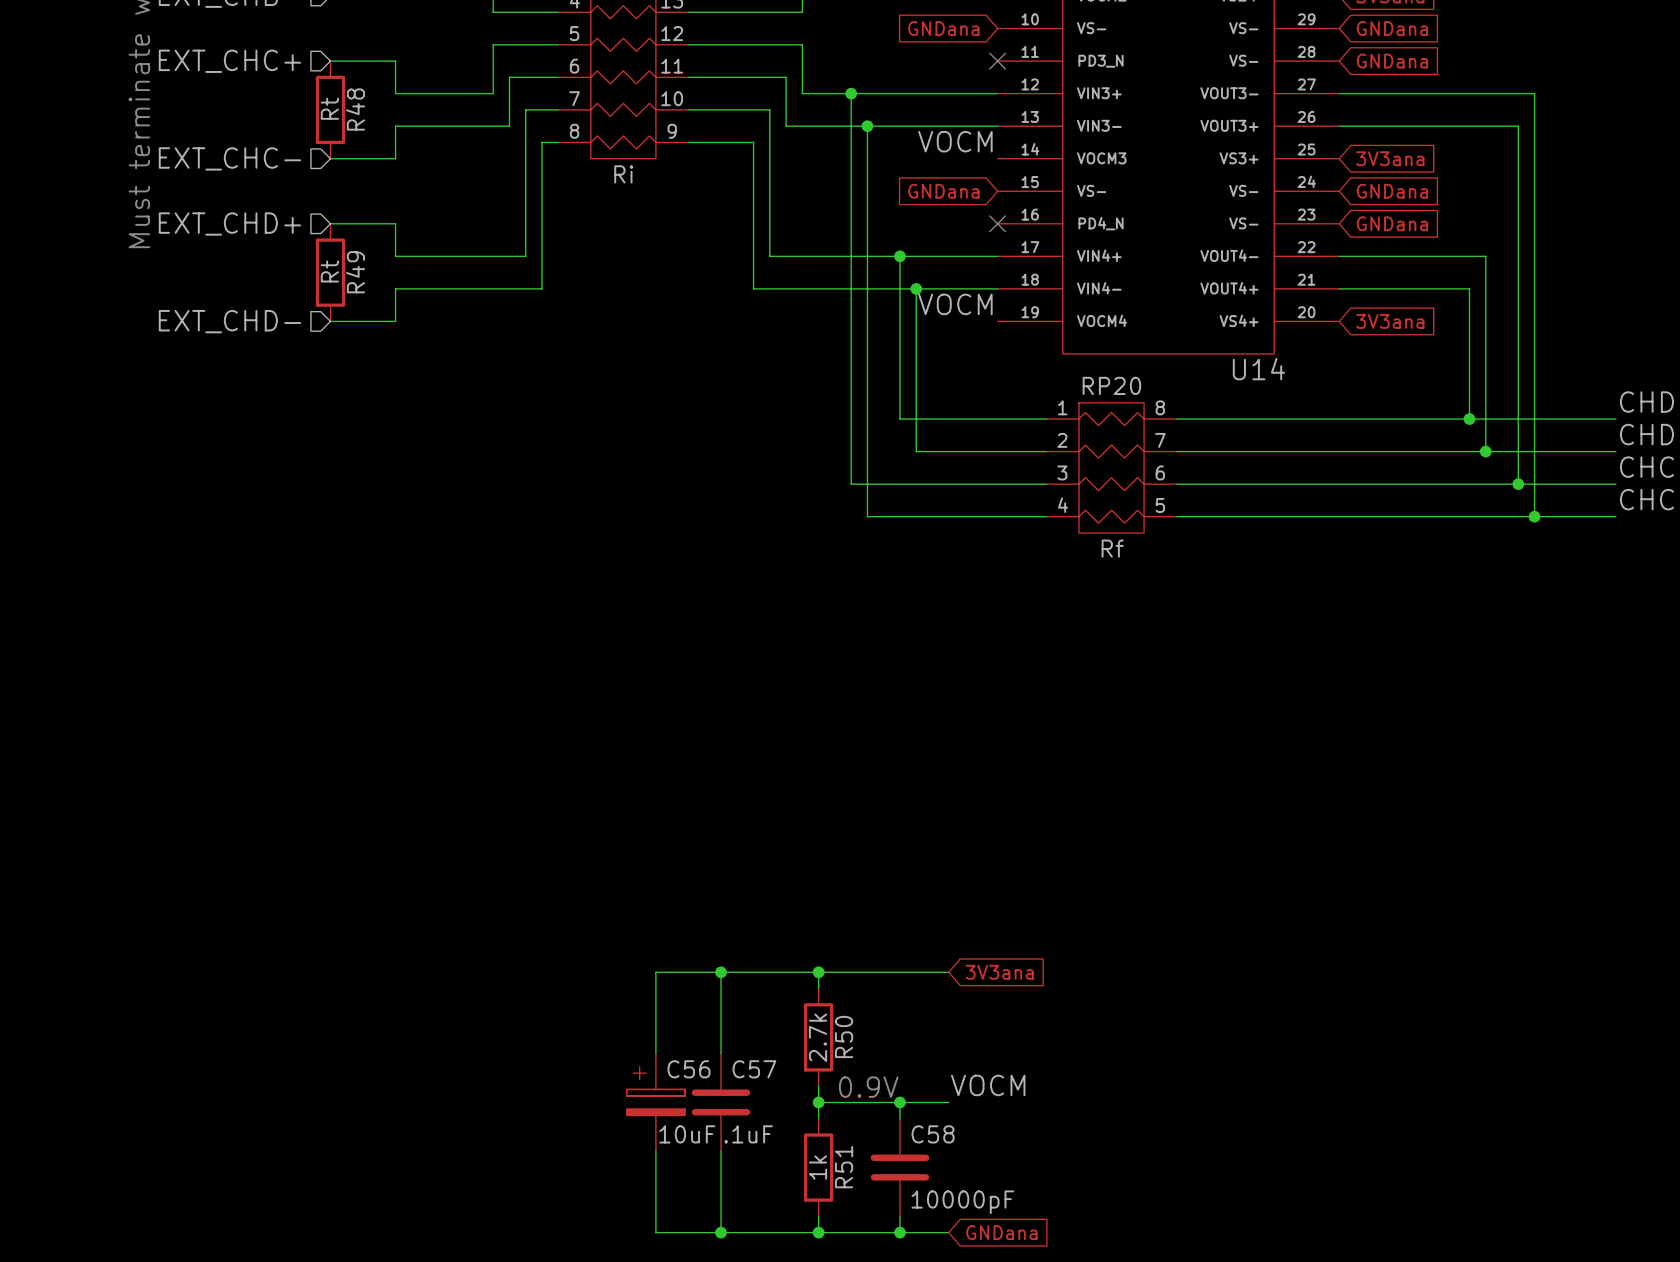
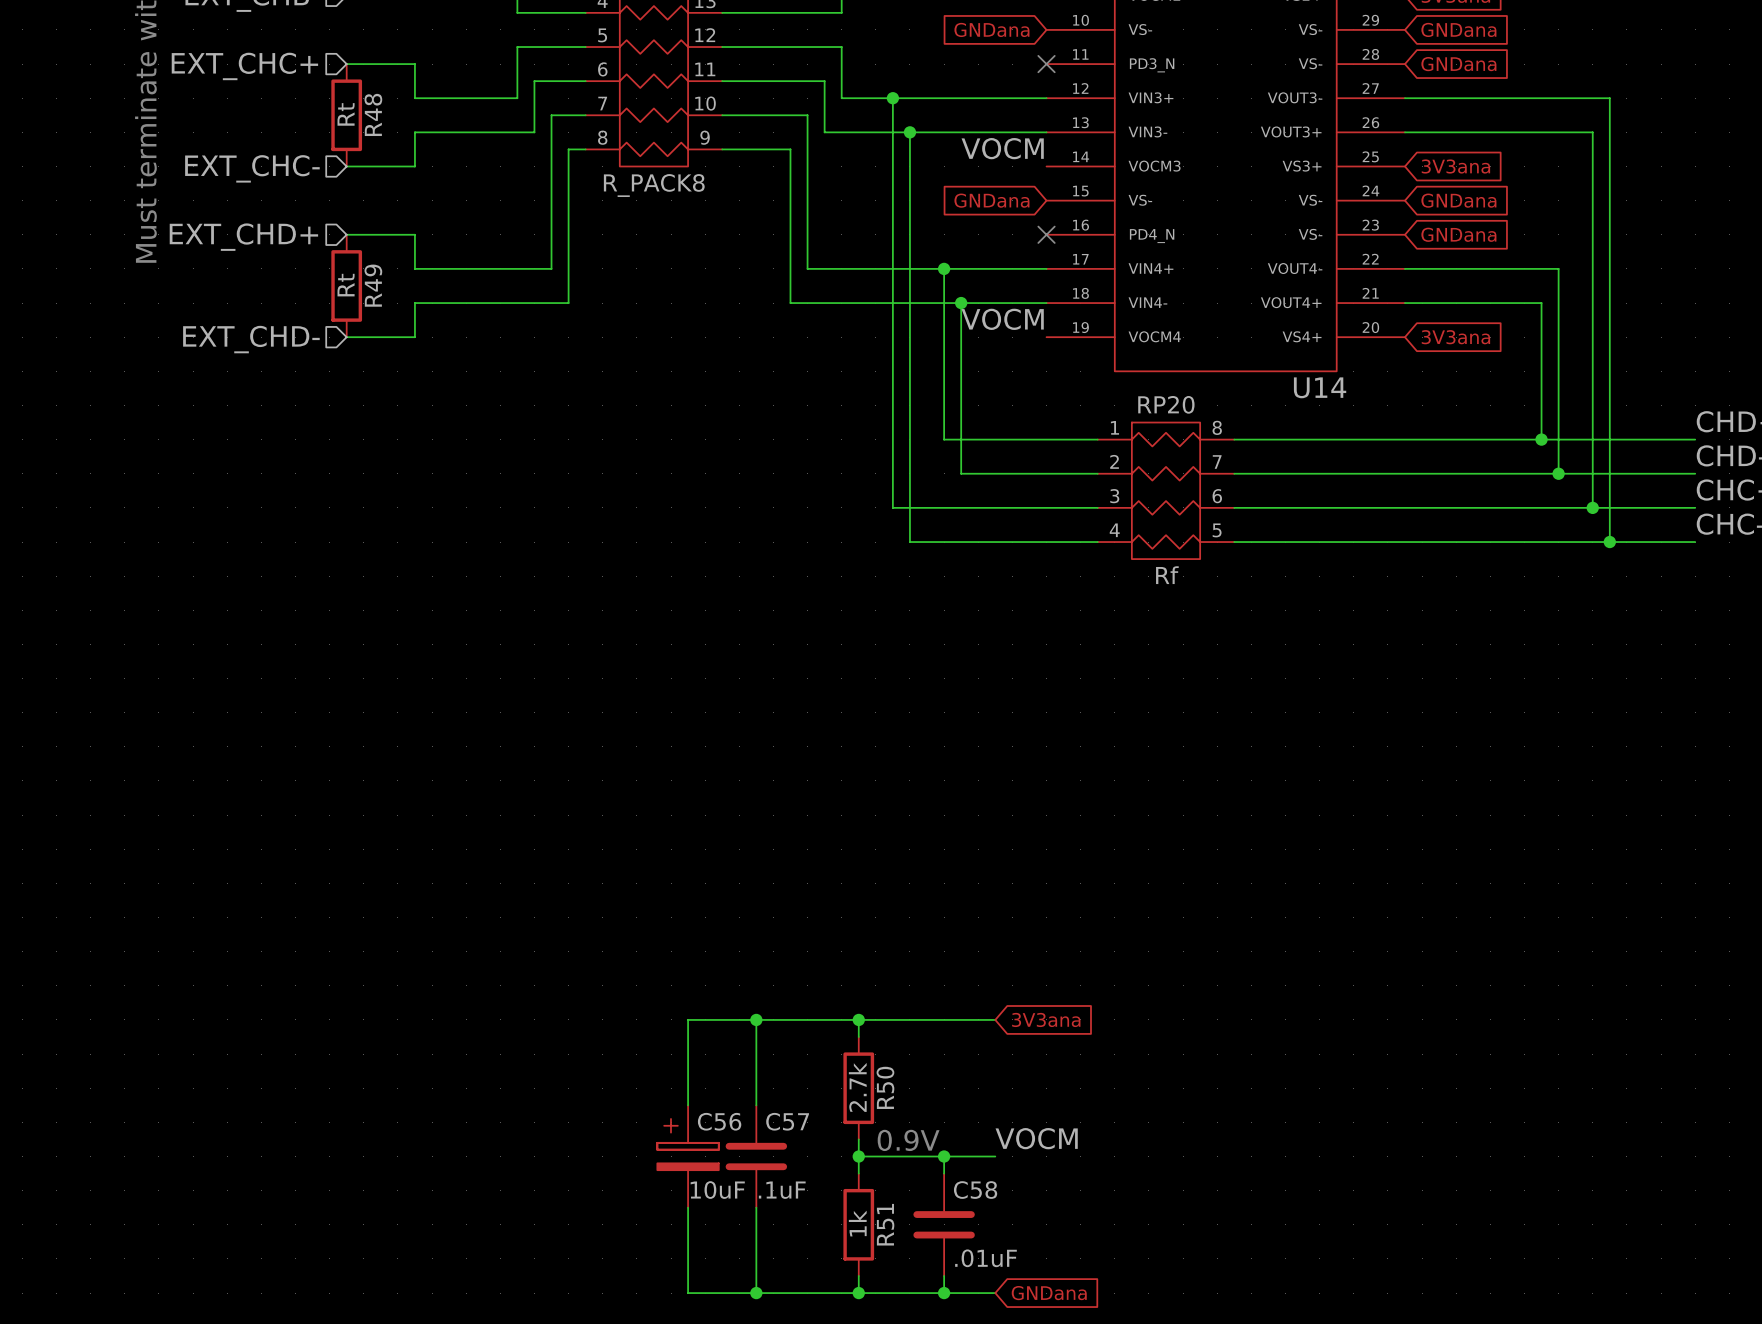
part value: Ri (623, 174) -> R_PACK8 (654, 185)
C58 value: 10000pF (962, 1202) -> .01uF (985, 1258)

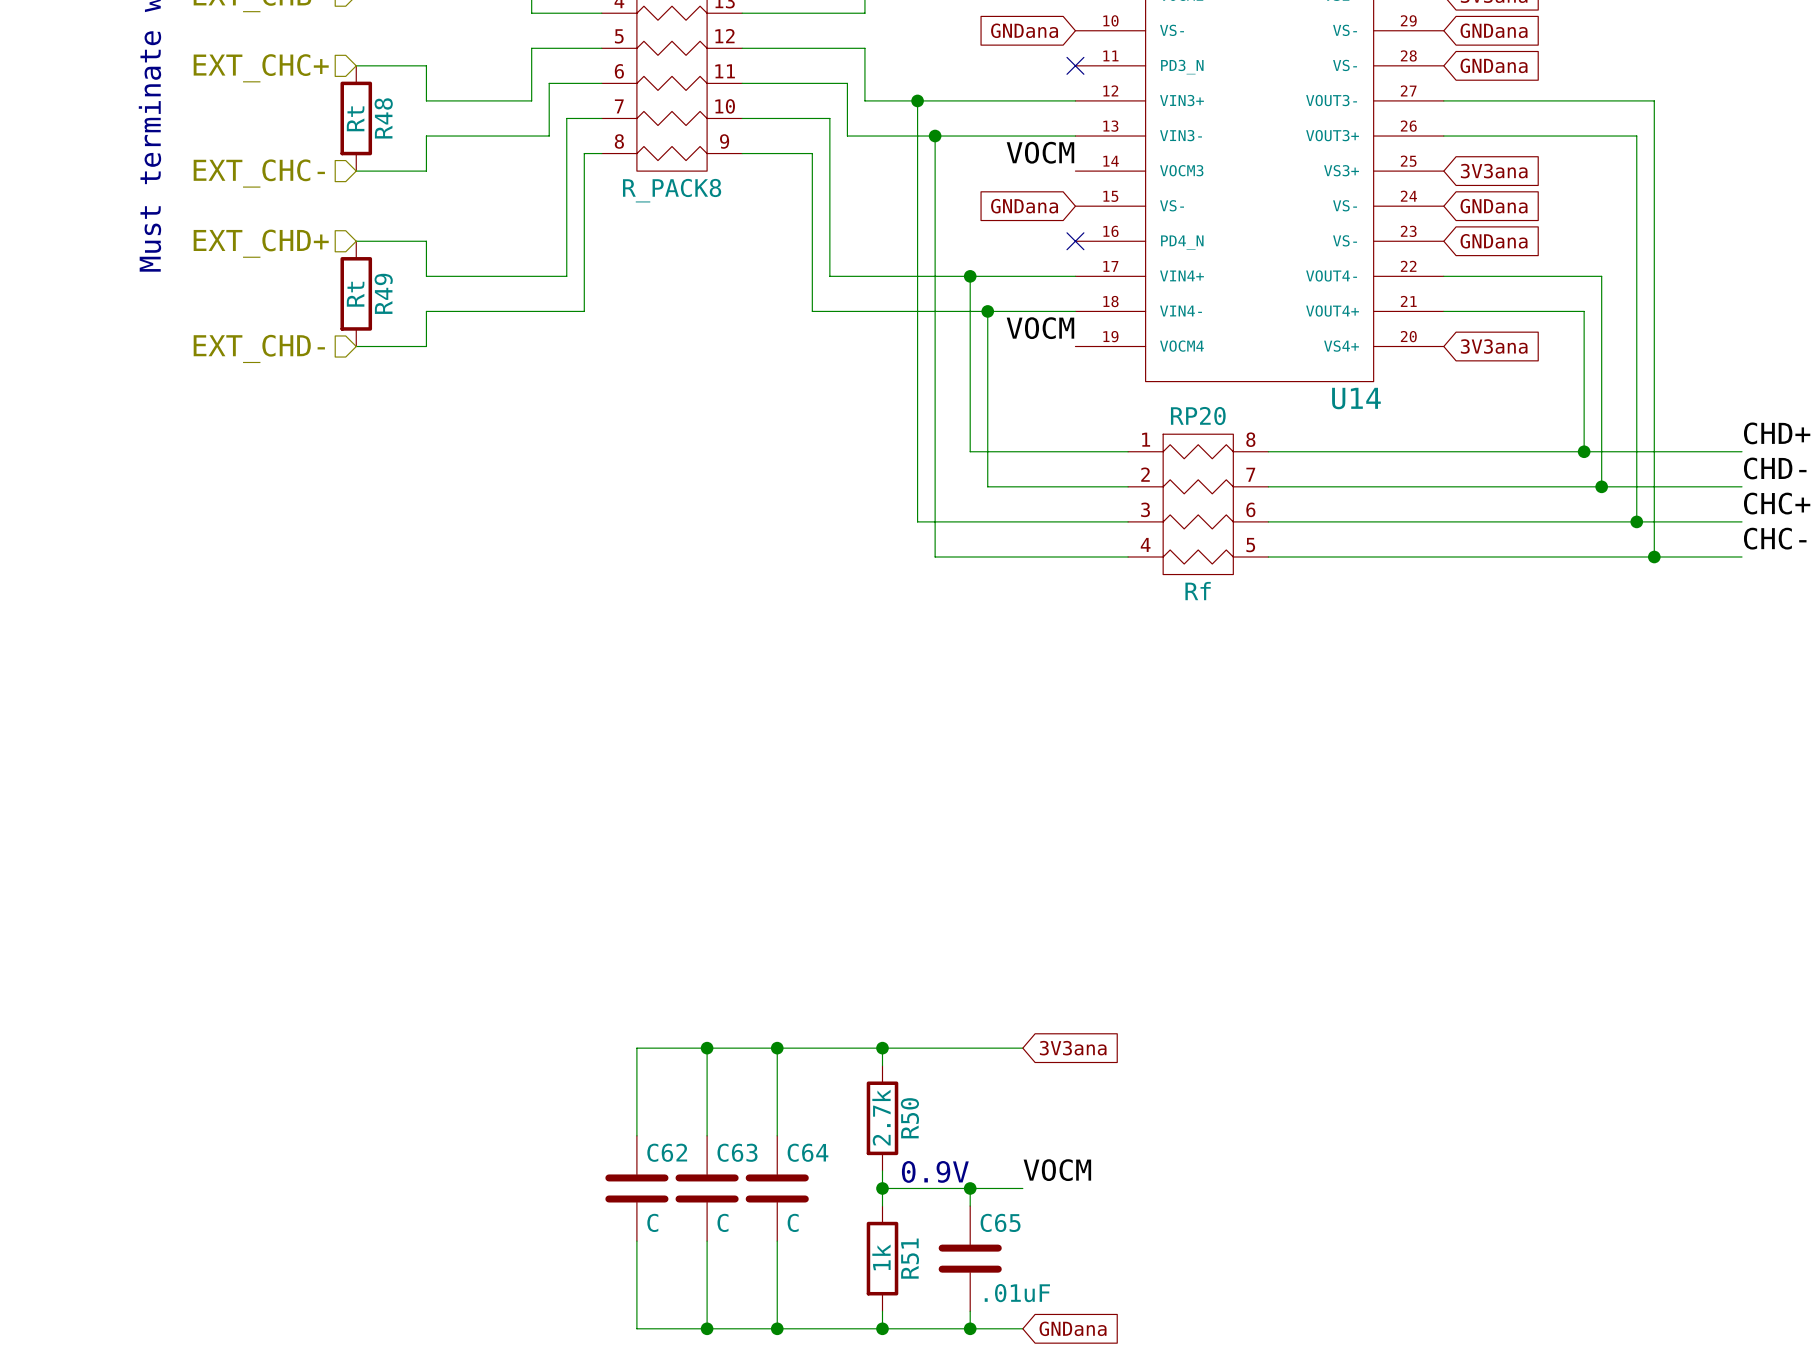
wire: none -> (707, 1048) (636, 1048) (636, 1135)
junction: none -> (707, 1048)
C57 name: C57 (787, 1121) -> C64 (807, 1152)
C62: none -> C (636, 1188)
C56: 10uF (688, 1156) -> none
C63: none -> C (707, 1188)
C57 value: .1uF (782, 1190) -> C (793, 1222)
C58 name: C58 (975, 1190) -> C65 (1000, 1222)
wire: none -> (636, 1241) (636, 1328) (707, 1328)
junction: none -> (707, 1328)

